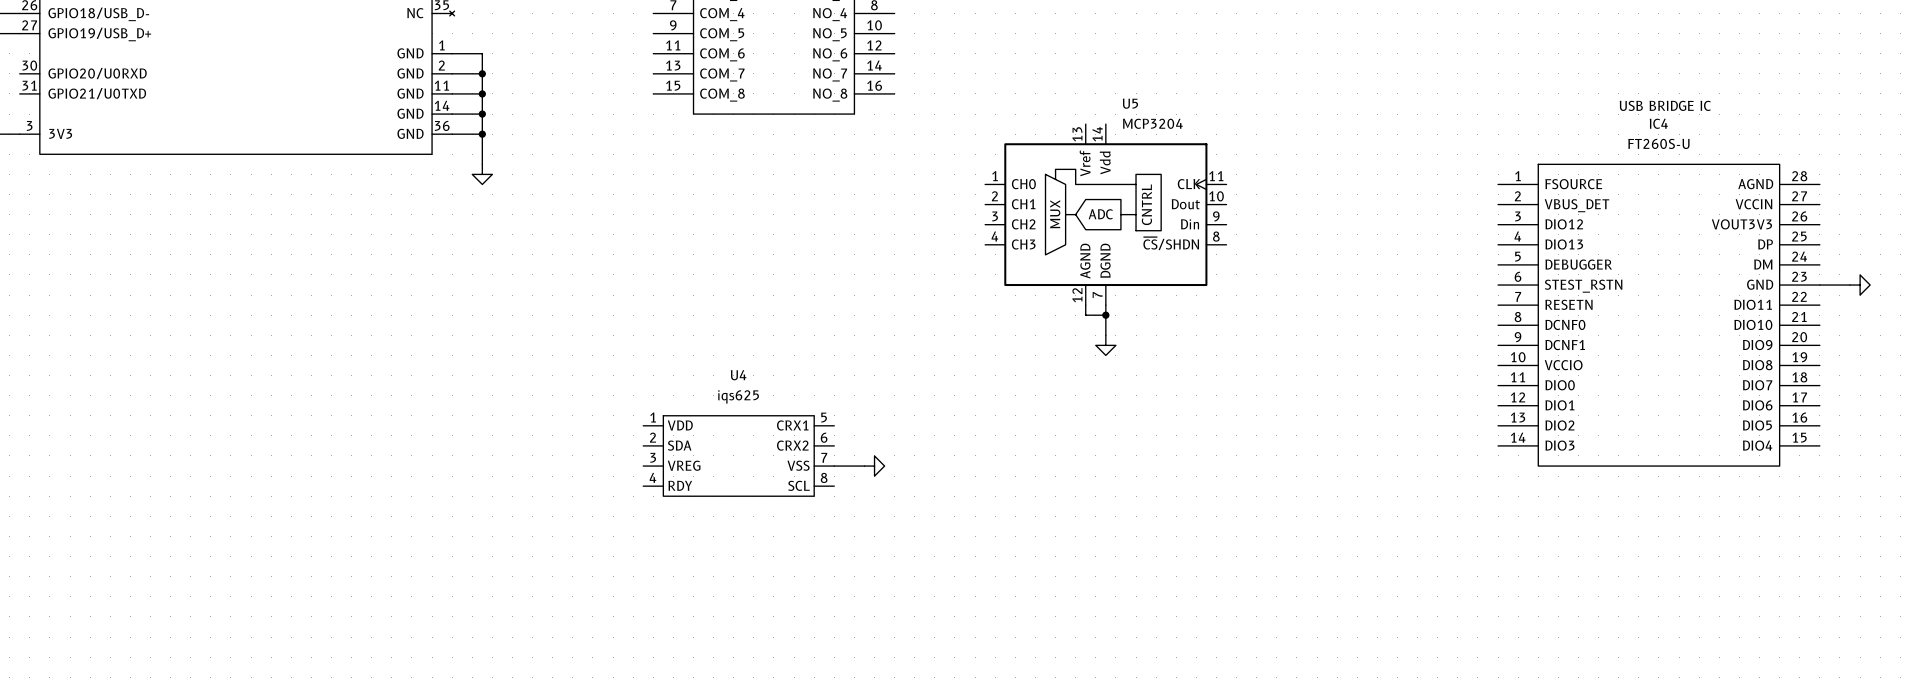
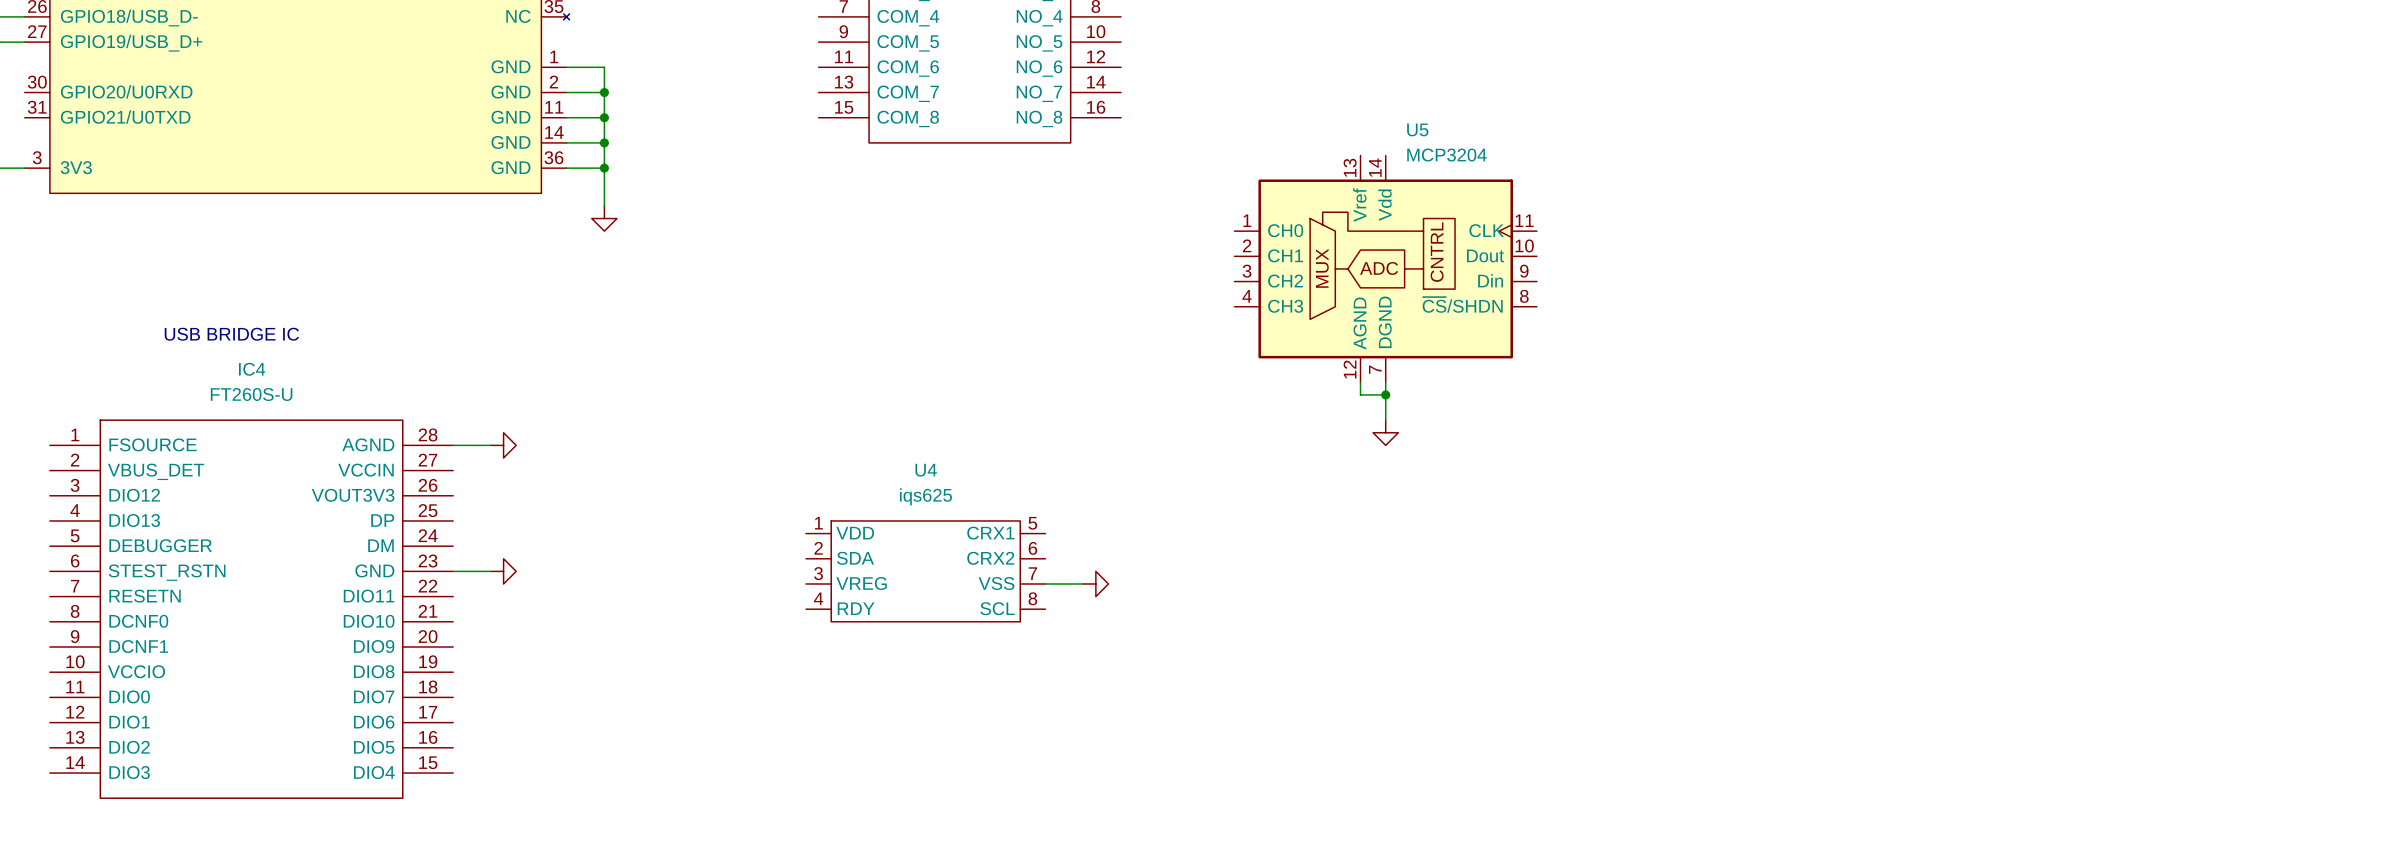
text: USB BRIDGE IC (1665, 105) -> none
text: none -> USB BRIDGE IC (231, 334)
wire: (1819, 285) (1850, 285) -> none
power symbol: (1860, 285) -> none
IC4 position: (1658, 315) -> (251, 609)
wire: none -> (453, 445) (490, 445)
power symbol: none -> (503, 445)
wire: none -> (453, 571) (490, 571)
power symbol: none -> (503, 571)

